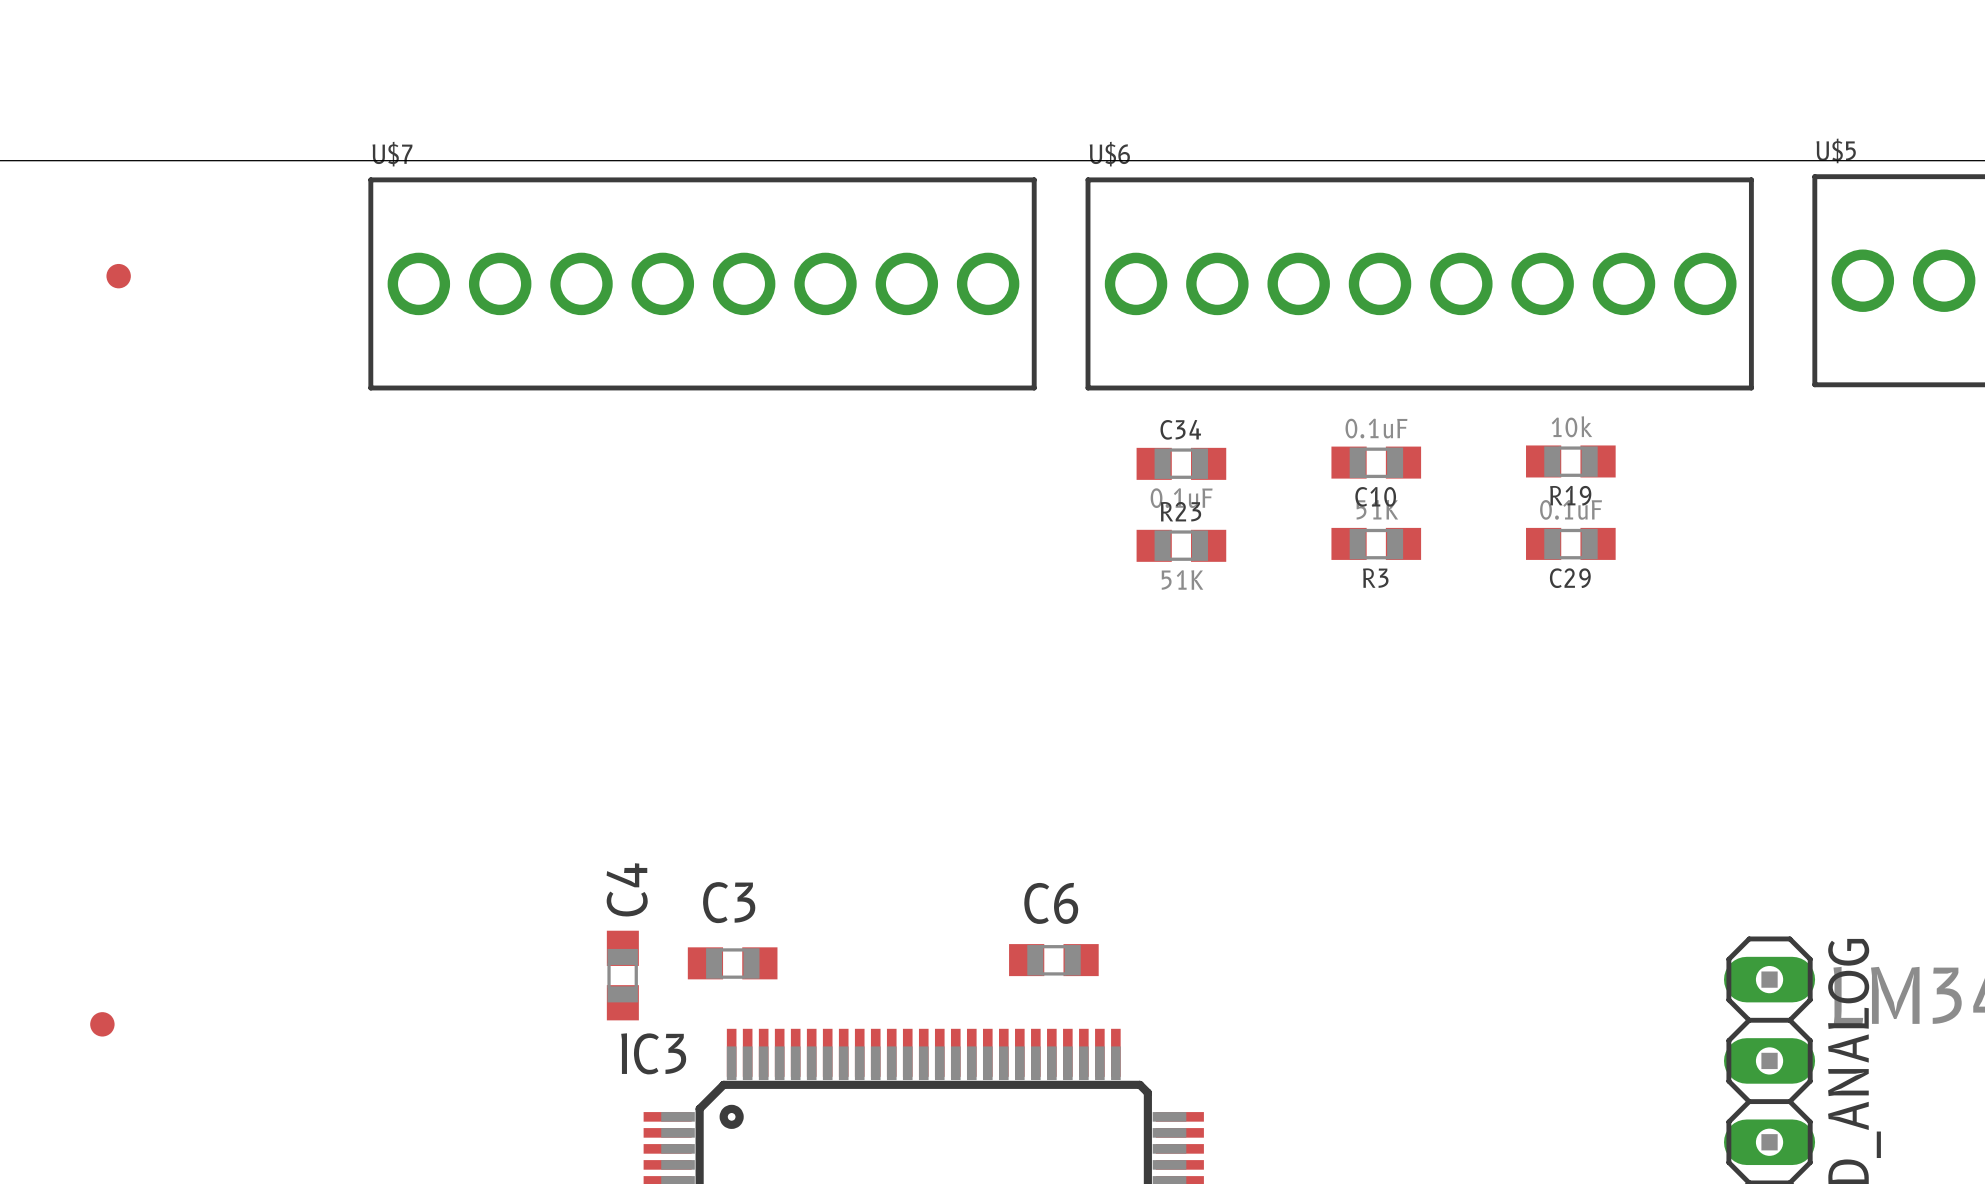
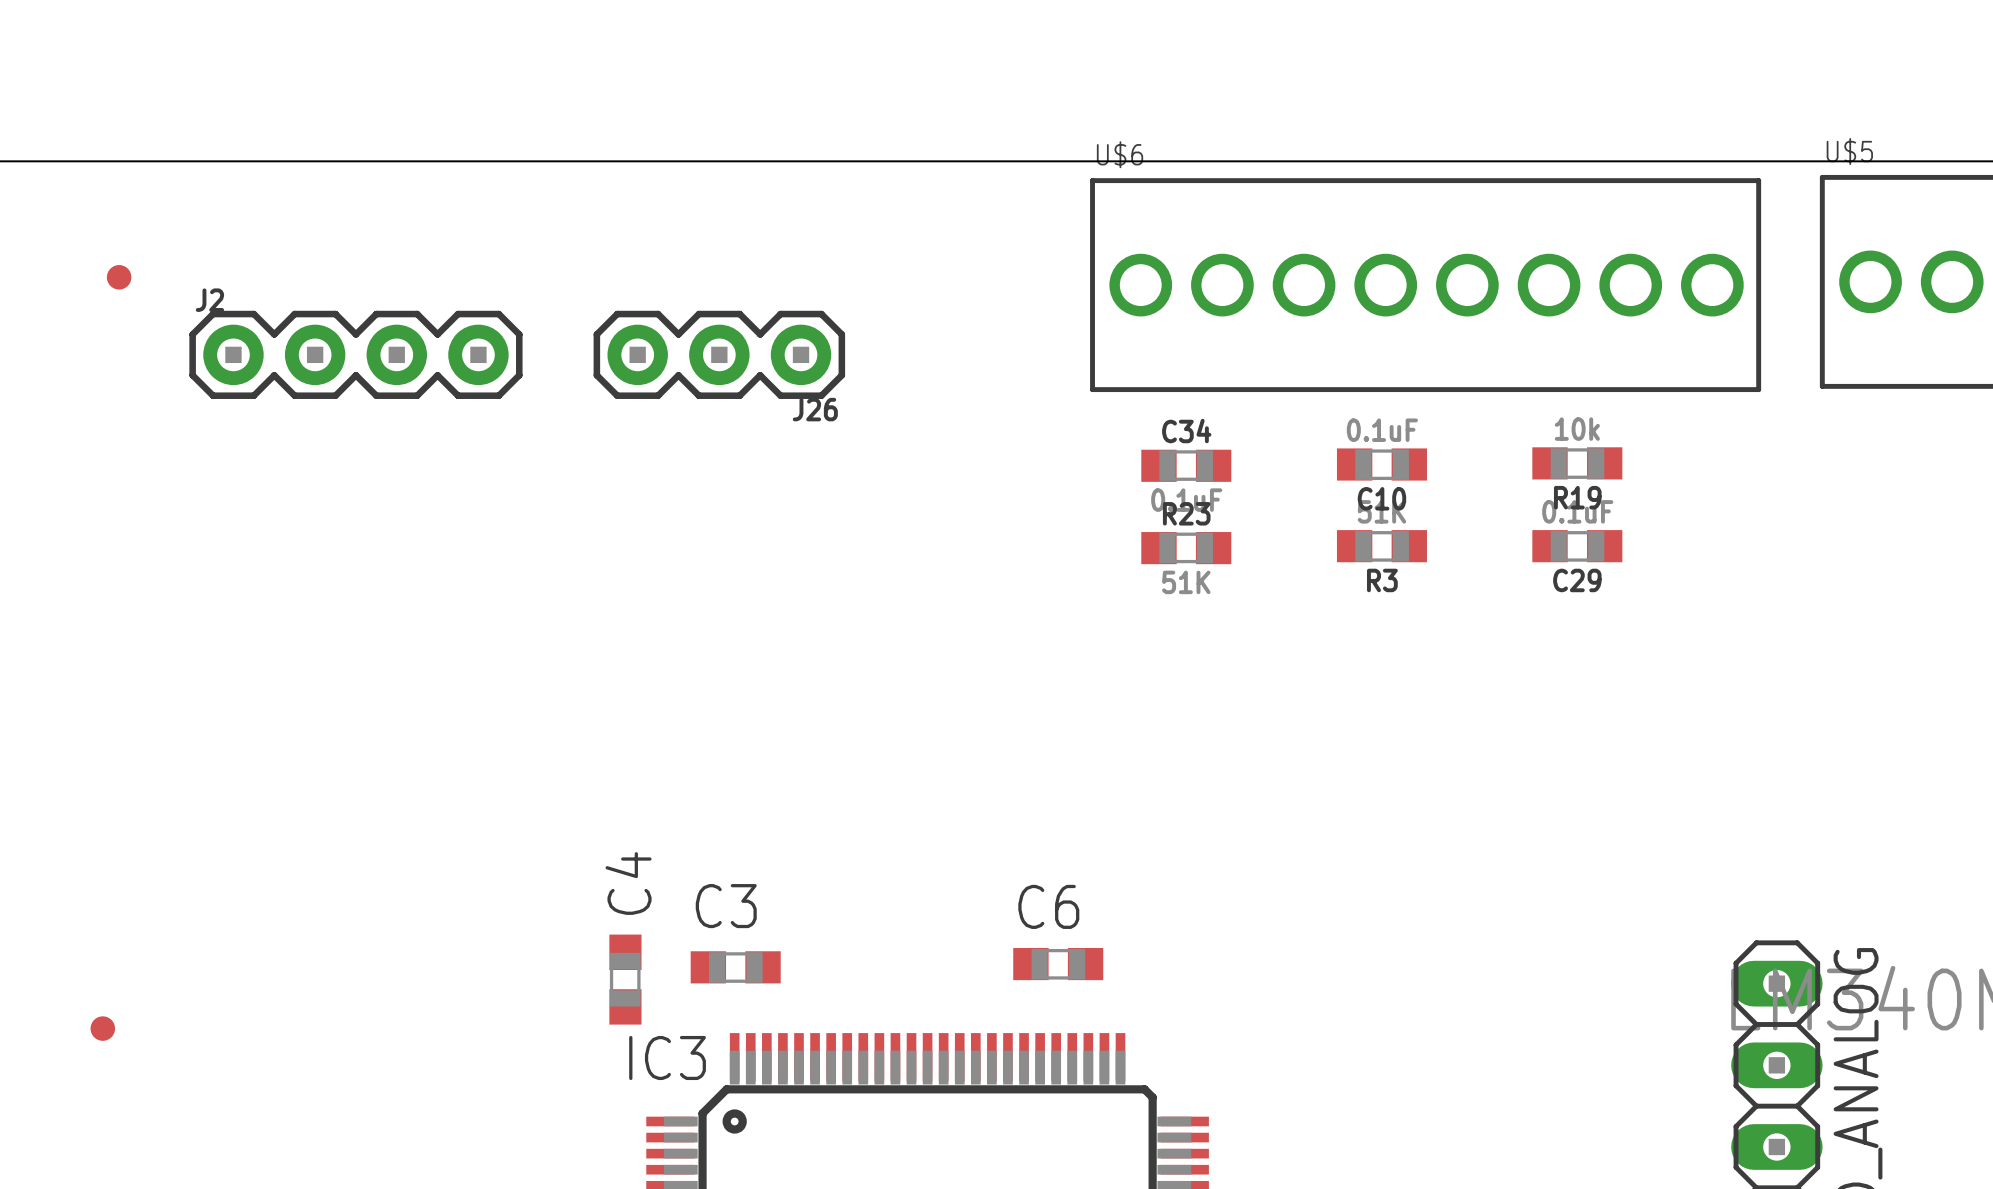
U$7: (702, 283) -> none
J2: none -> (355, 354)
J26: none -> (719, 354)

